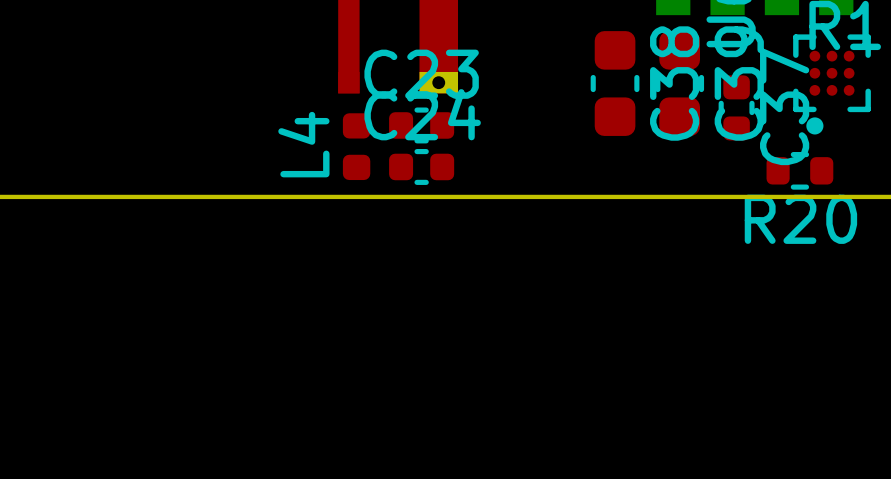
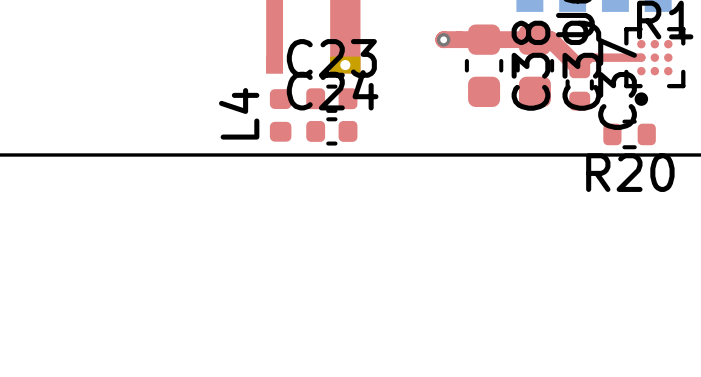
top track: none -> (443, 39) (550, 39) (579, 68) (590, 57) (641, 57)
via: none -> (443, 39)

